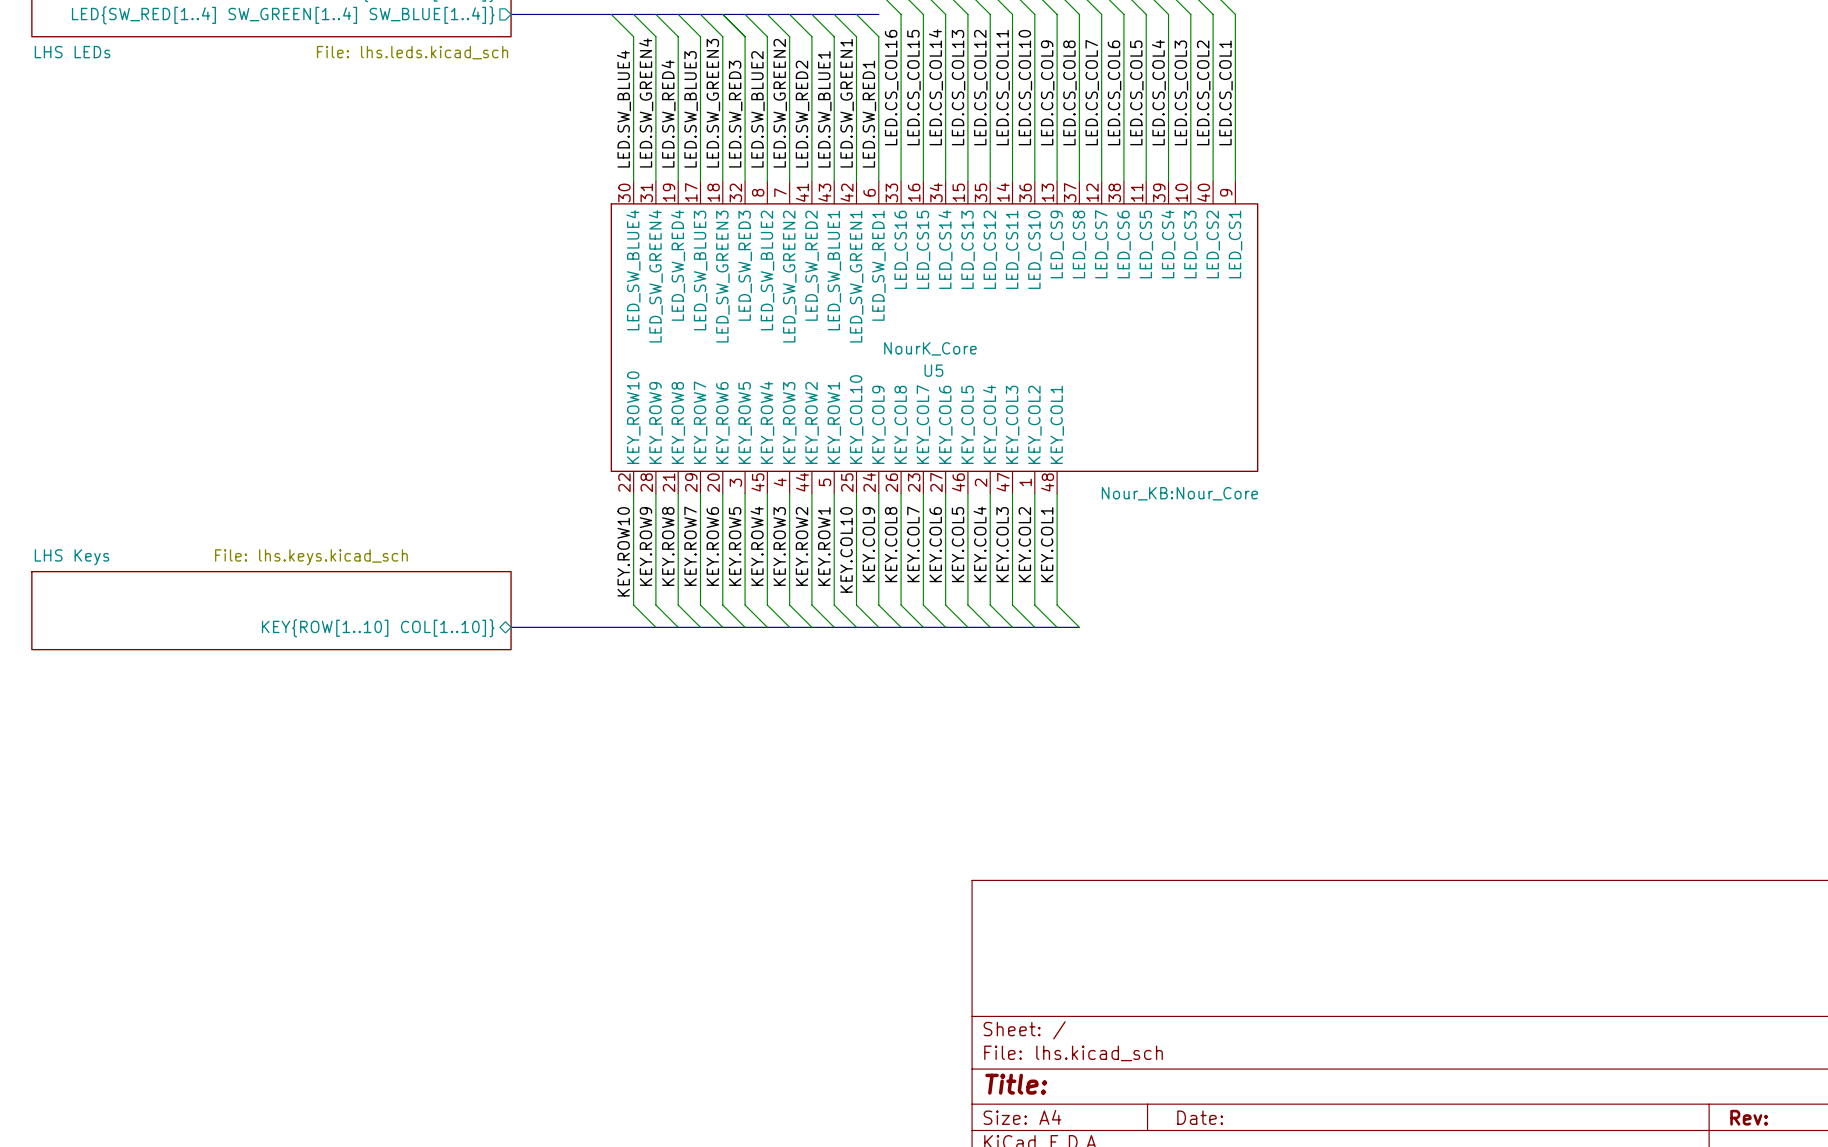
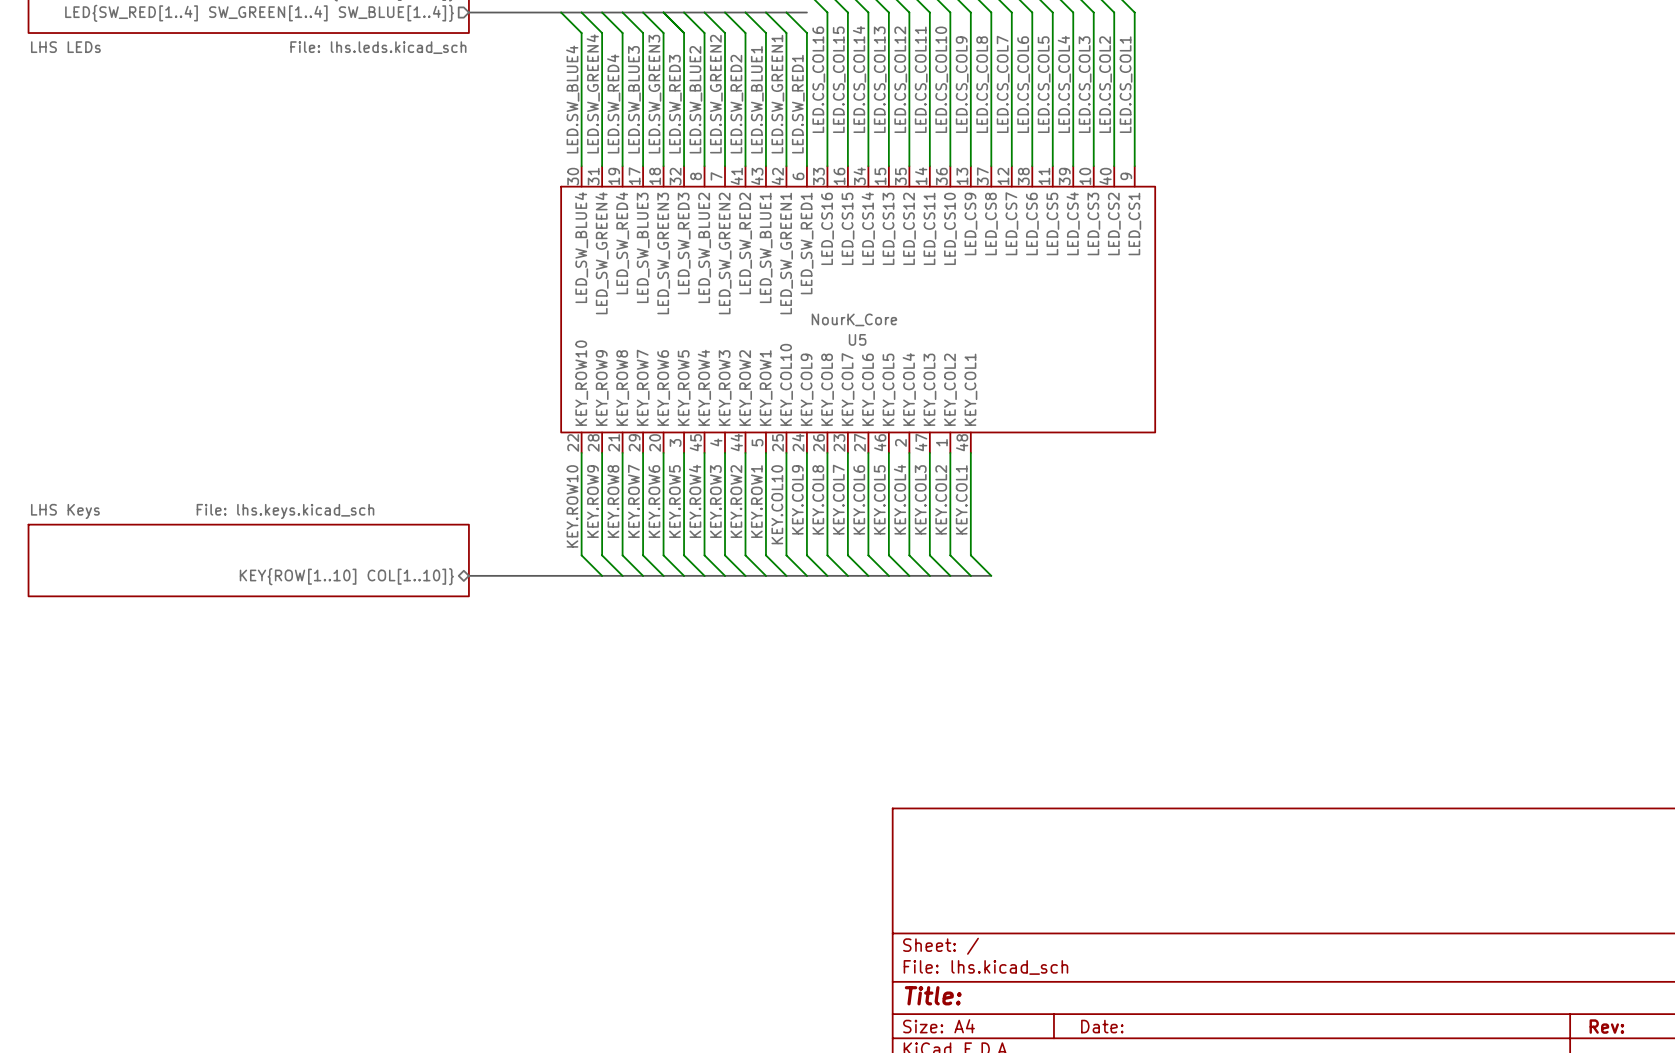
U5 text: Nour_KB:Nour_Core (1179, 493) -> none

